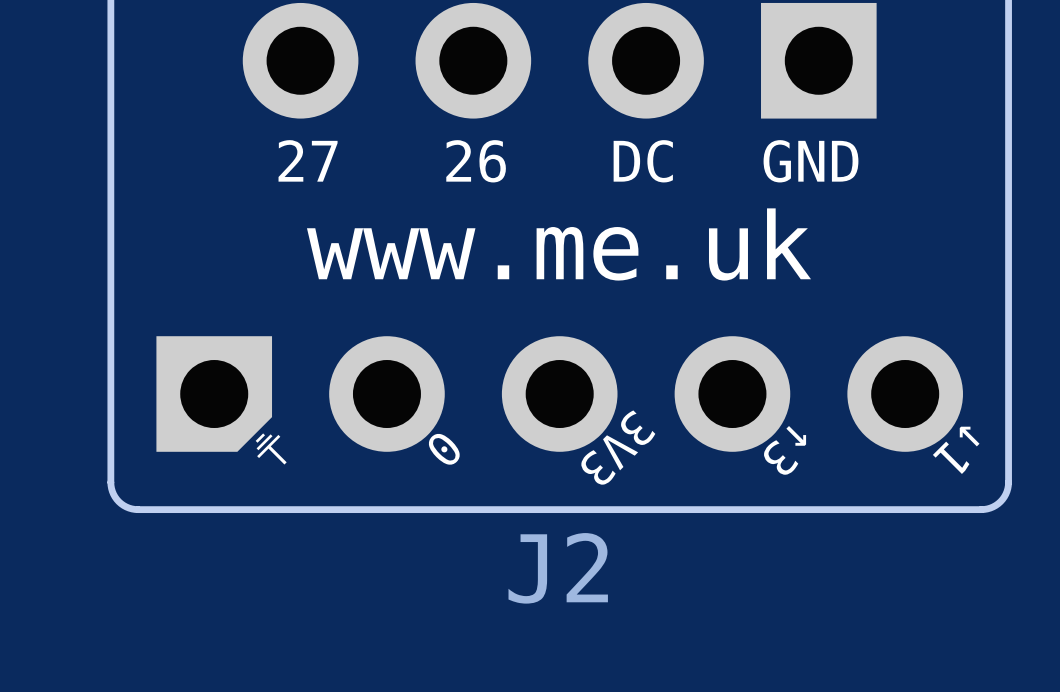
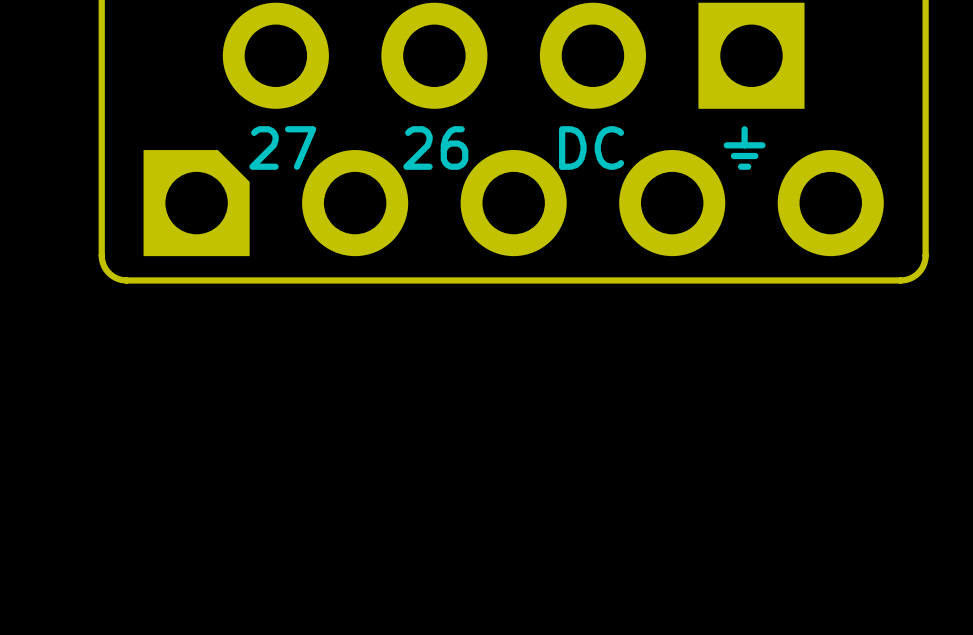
text: GND (810, 161) -> ⏚ (744, 147)
text: www.me.uk (558, 244) -> none
board edge: (1008, 278) (1008, 485) (1004, 496) (998, 503) (990, 508) (981, 509) (132, 508) (118, 501) (113, 494) (111, 485) (110, 278) -> (925, 255) (923, 266) (918, 273) (911, 277) (900, 280) (126, 280) (115, 277) (109, 273) (104, 266) (101, 255)
J2 side: bottom (559, 394) -> top (513, 203)

